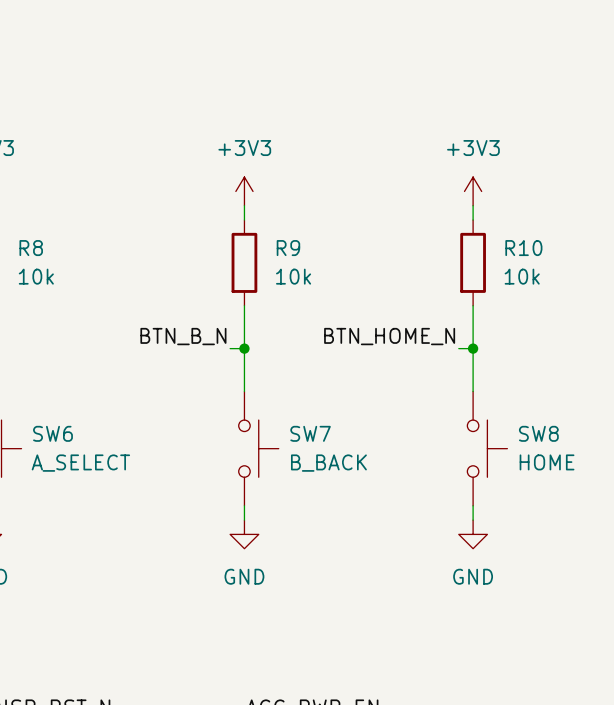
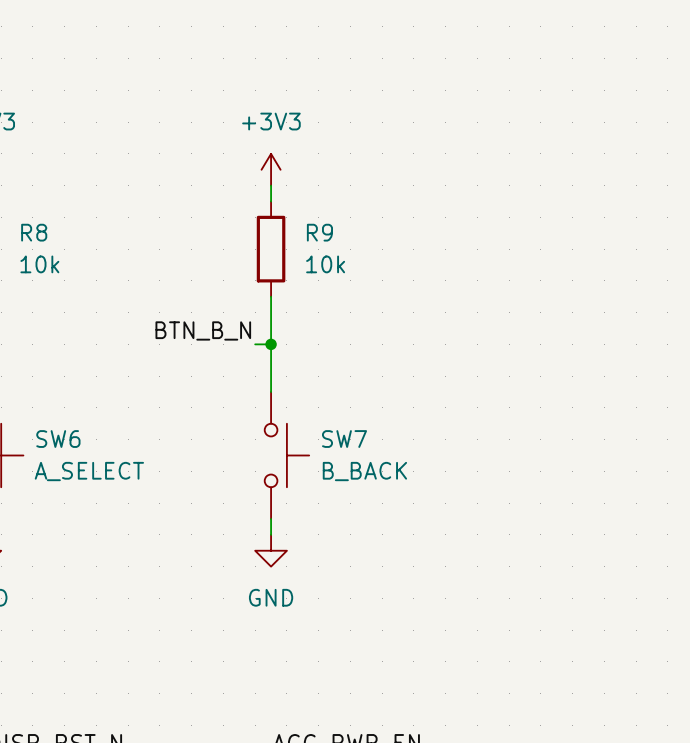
power symbol: +3V3 (473, 191) -> none
wire: (473, 205) (473, 220) -> none
R10: 10k (473, 262) -> none
wire: (473, 305) (473, 391) -> none
label: BTN_HOME_N (389, 336) -> none
wire: (458, 348) (473, 348) -> none
junction: (473, 348) -> none
SW8: HOME (487, 448) -> none
wire: (473, 505) (473, 520) -> none
power symbol: GND (473, 534) -> none

